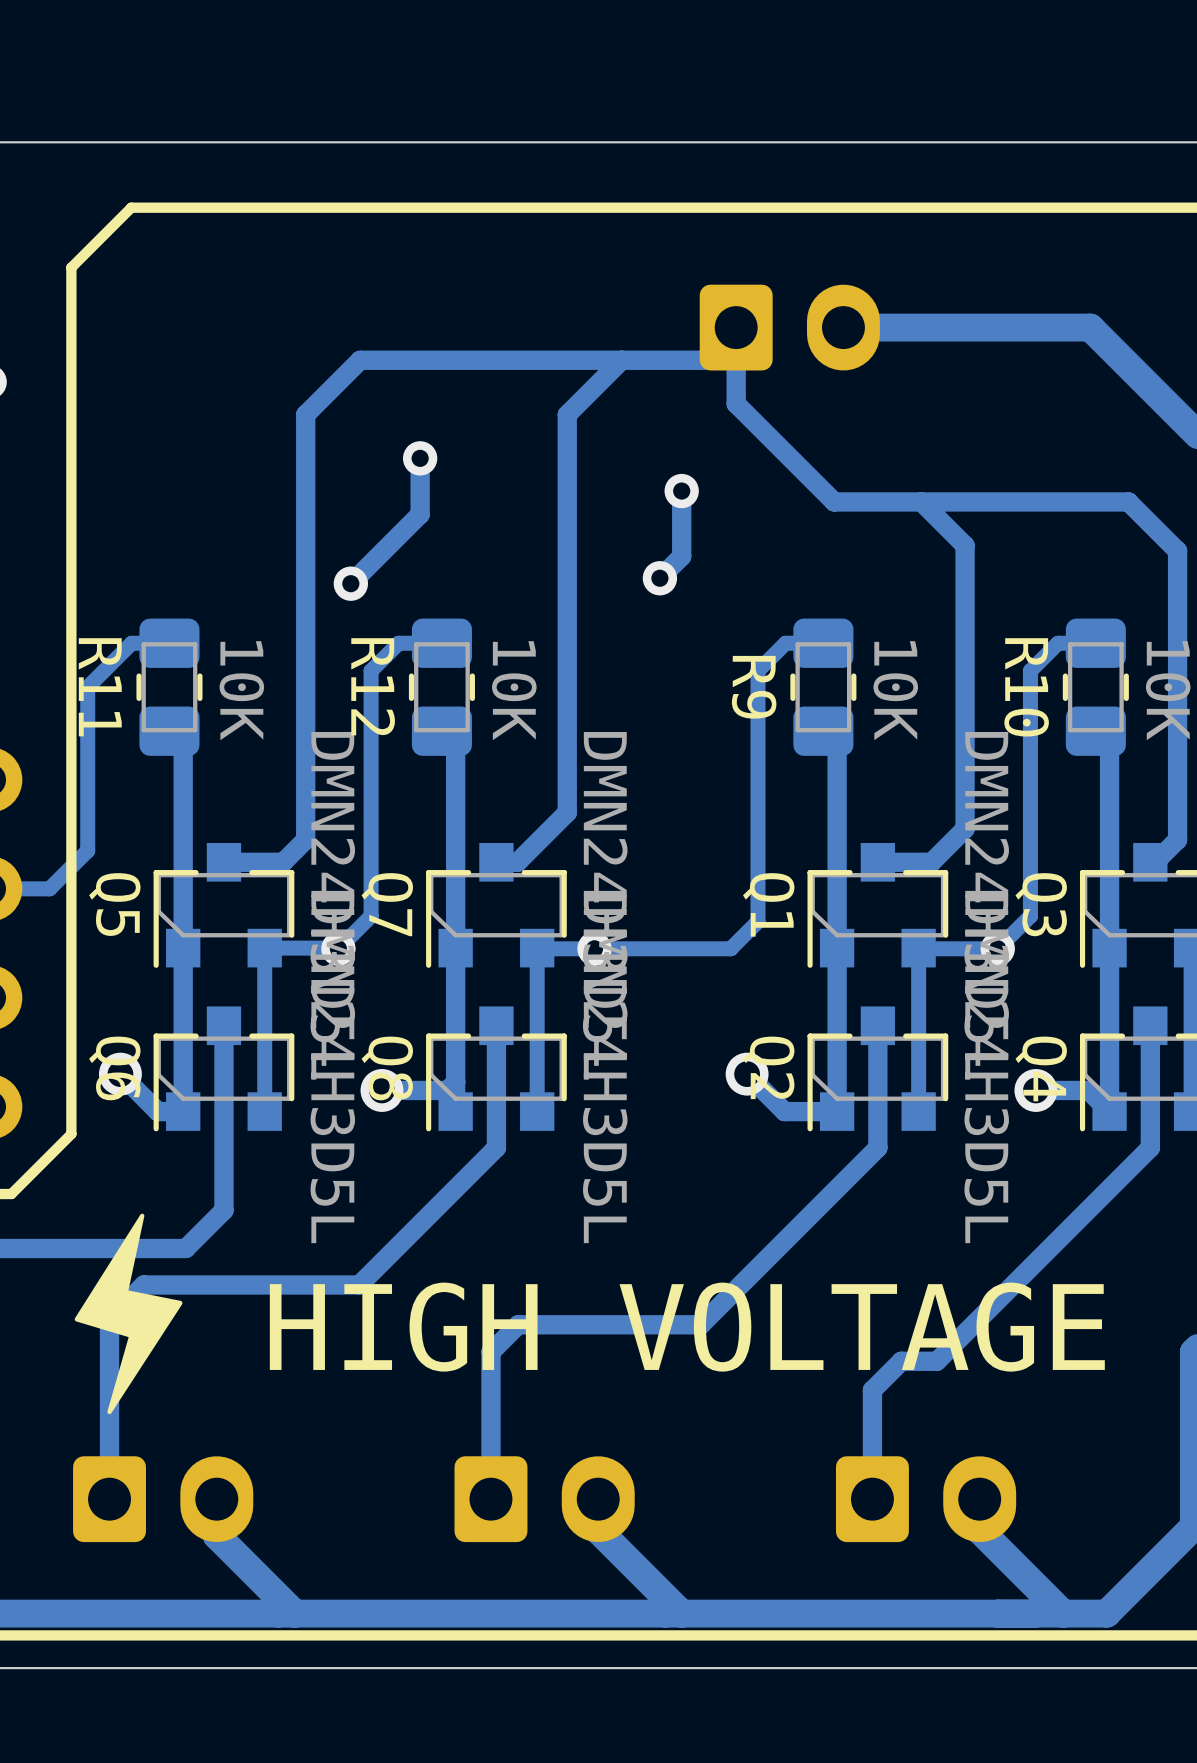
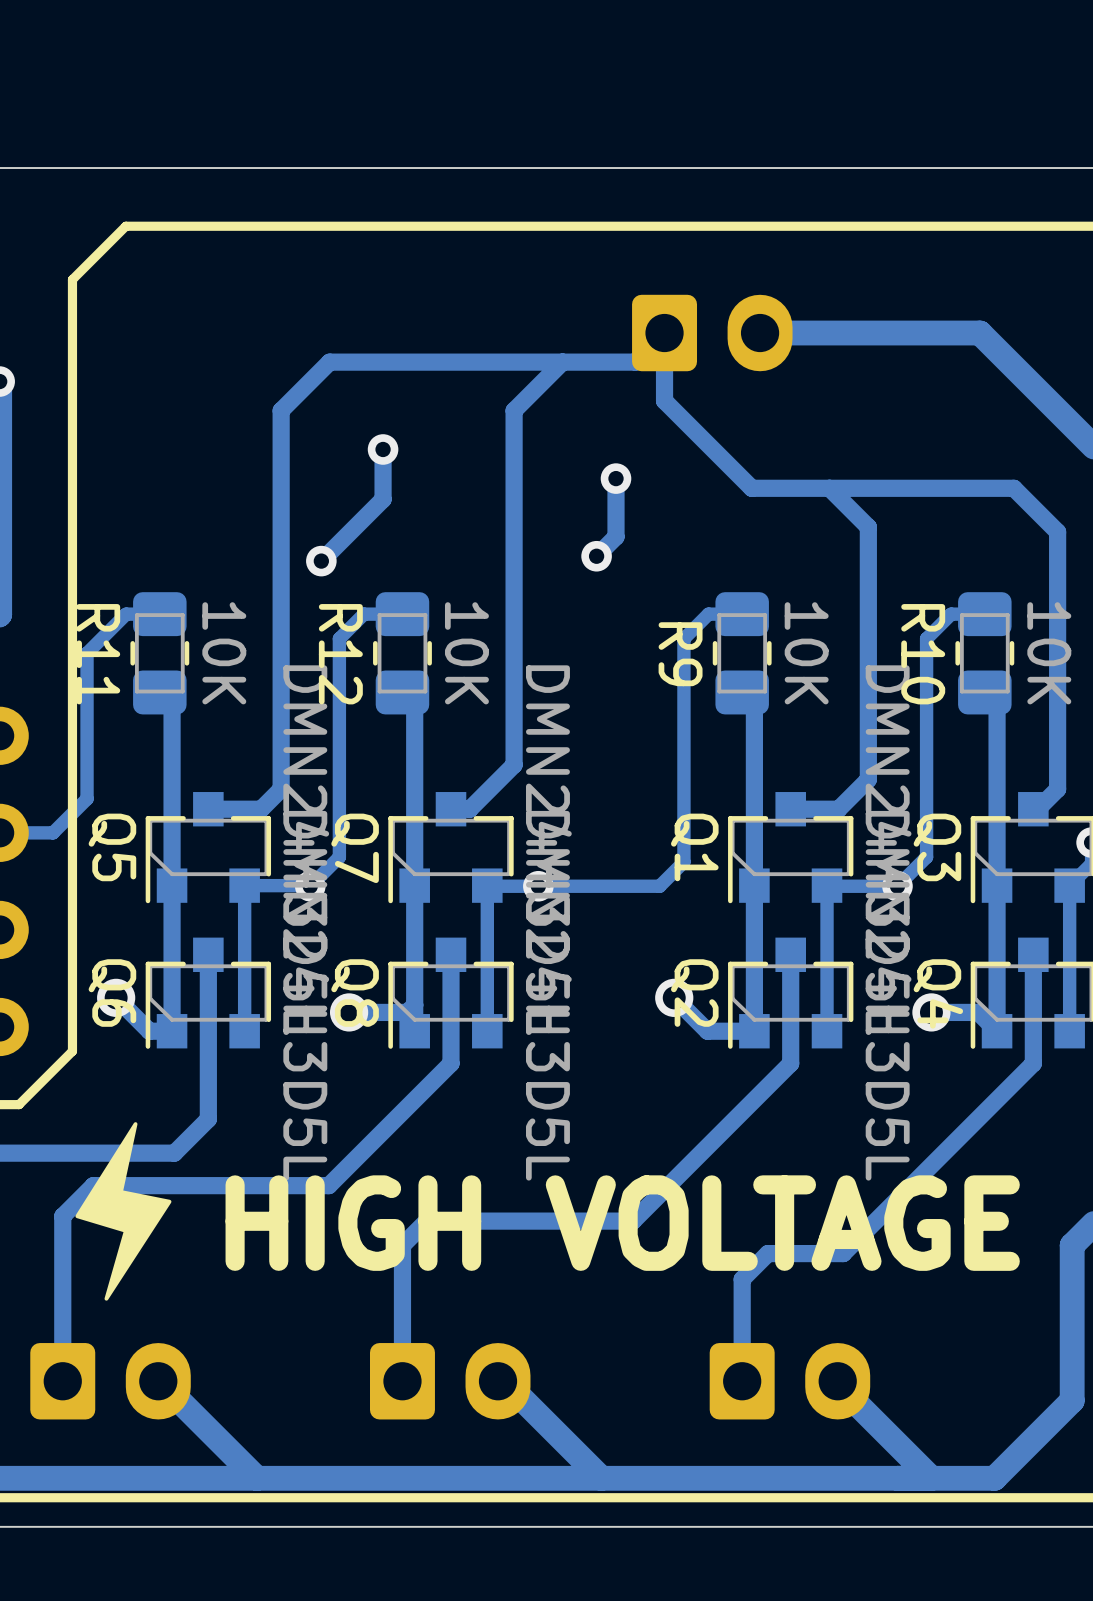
track: (143, 1284) (109, 1319) (109, 1499) -> (137, 1185) (93, 1185) (62, 1216) (62, 1381)
track: (518, 1324) (490, 1352) (490, 1499) -> (470, 1221) (426, 1221) (402, 1245) (402, 1381)
track: (901, 1361) (872, 1390) (872, 1499) -> (811, 1253) (767, 1253) (742, 1279) (742, 1381)
part position: (163, 1499) -> (110, 1381)
track: (216, 1499) (216, 1535) (294, 1613) -> none
part position: (544, 1499) -> (450, 1381)
track: (598, 1499) (598, 1530) (681, 1613) -> none
part position: (926, 1499) -> (789, 1381)
track: (979, 1499) (979, 1530) (1063, 1613) -> none
track: none -> (158, 1381) (256, 1478)
track: none -> (498, 1381) (504, 1381) (601, 1478)
track: none -> (837, 1381) (837, 1384) (931, 1478)

